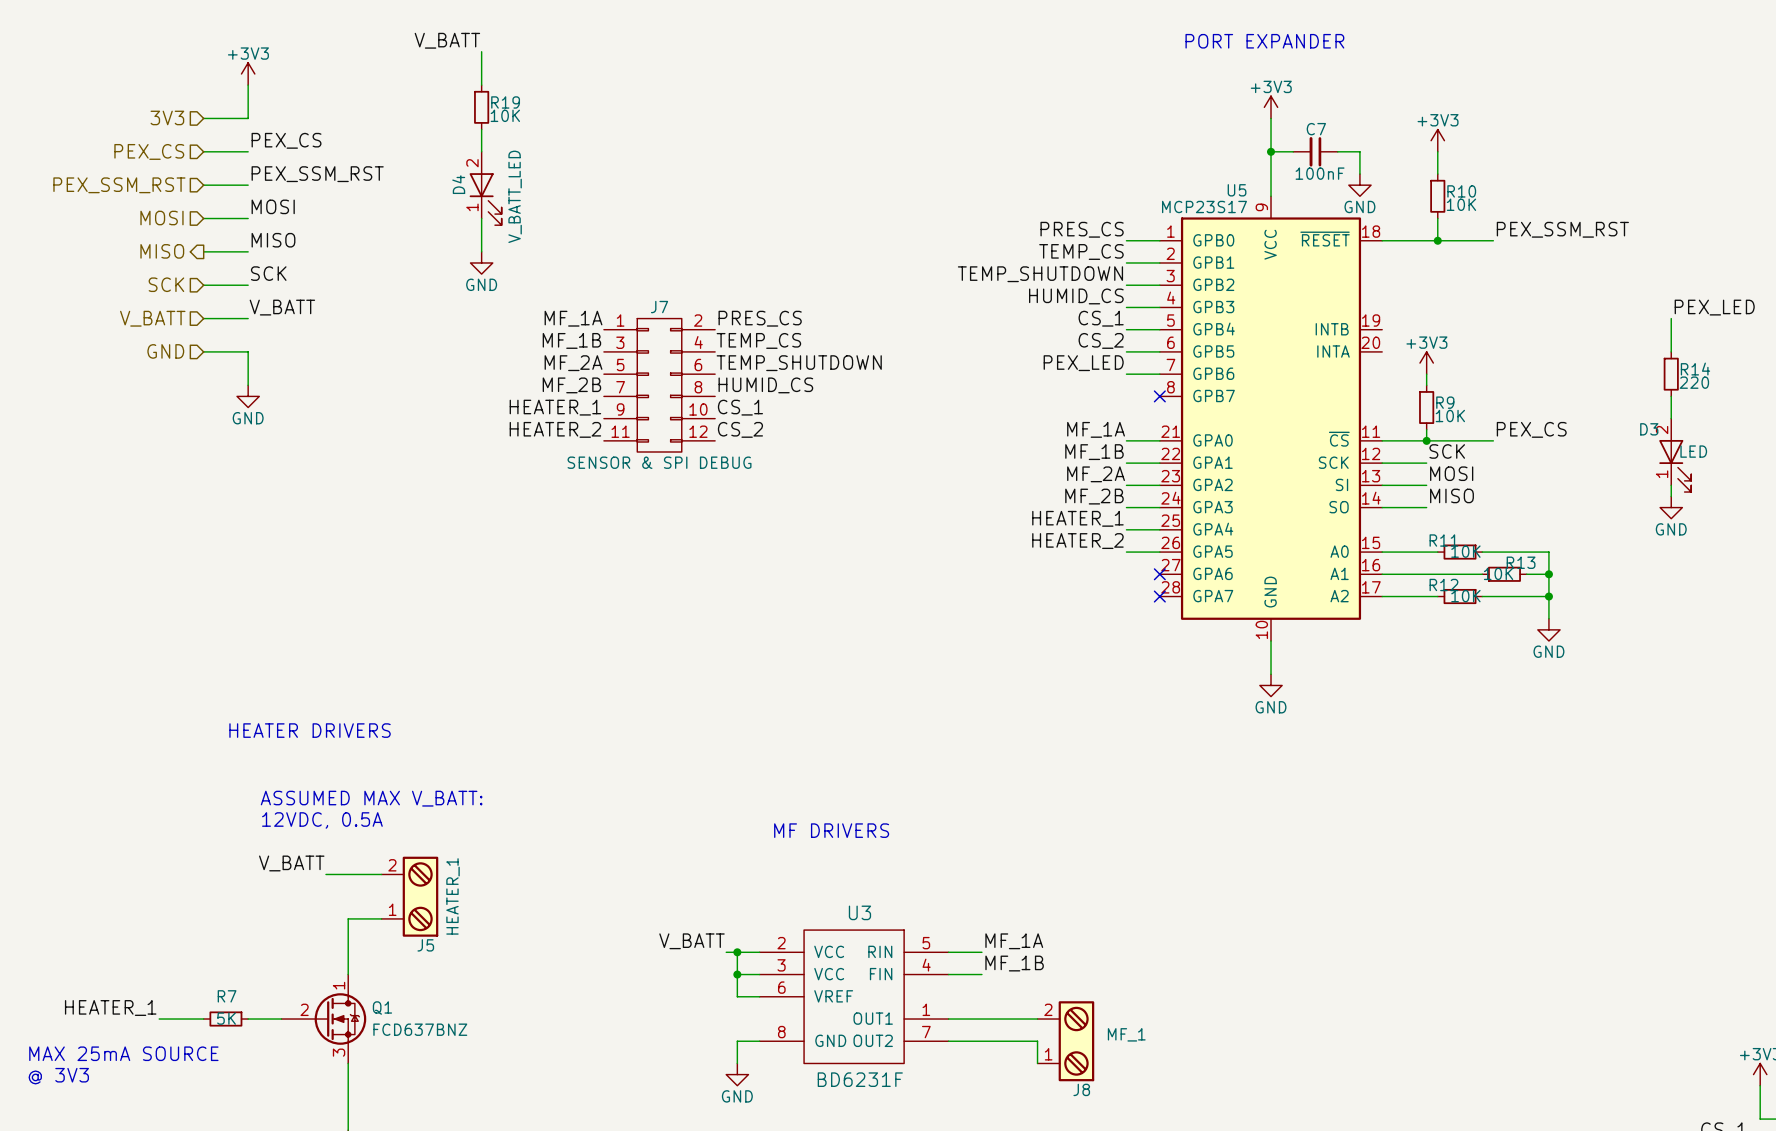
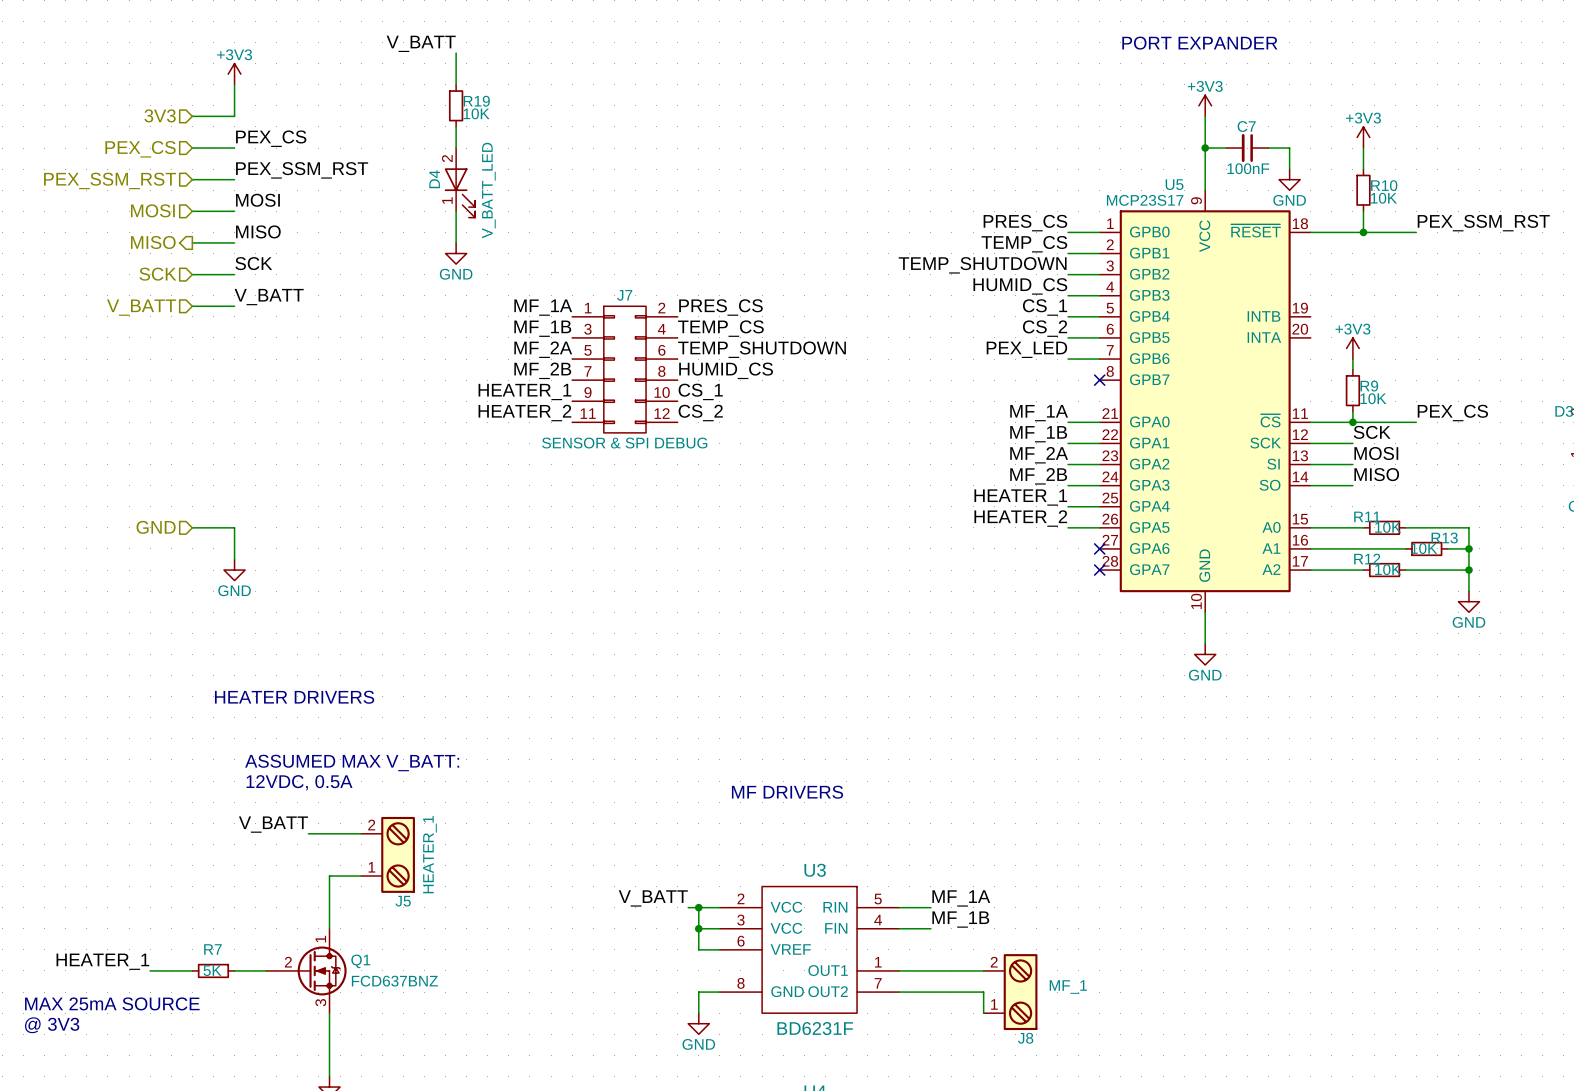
hierarchical label position: GND (165, 351) -> GND (156, 527)
wire: (203, 351) (248, 351) (248, 385) -> (192, 527) (234, 527) (234, 559)
power symbol position: GND (248, 396) -> GND (234, 570)

